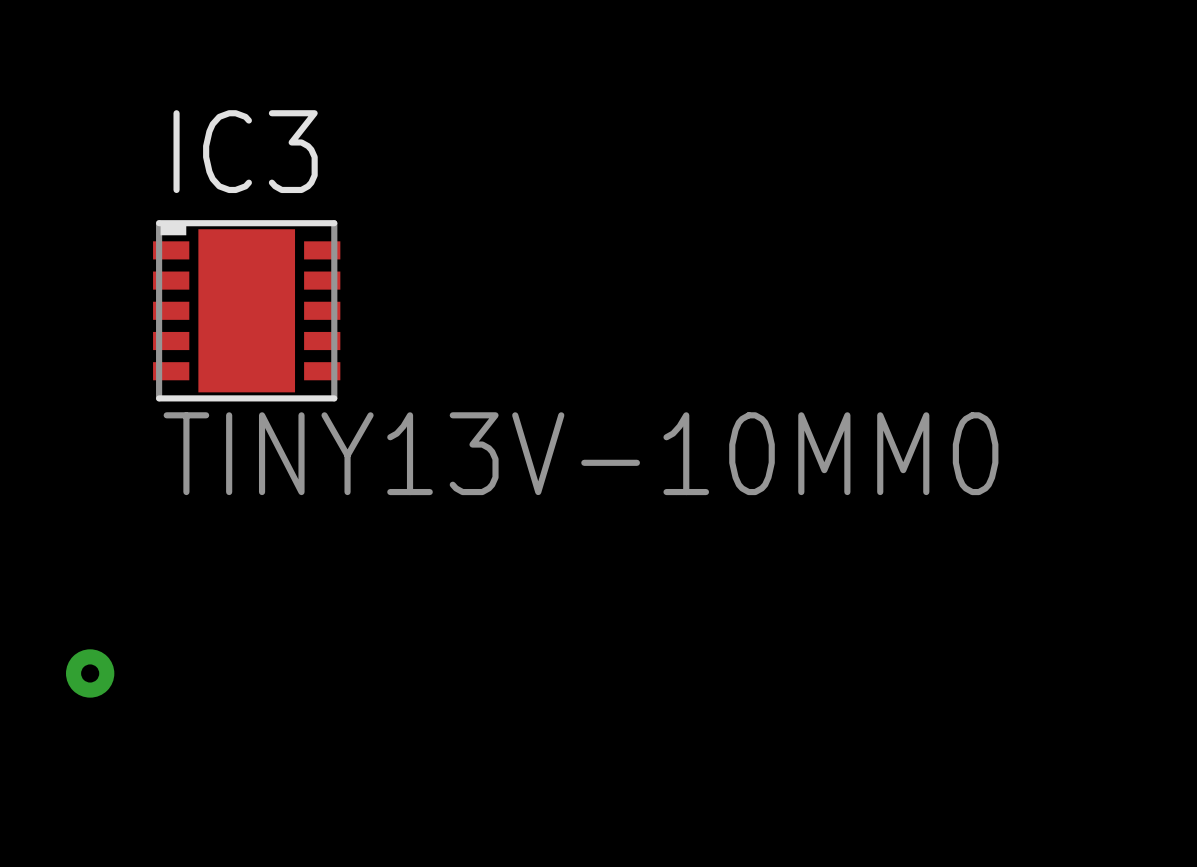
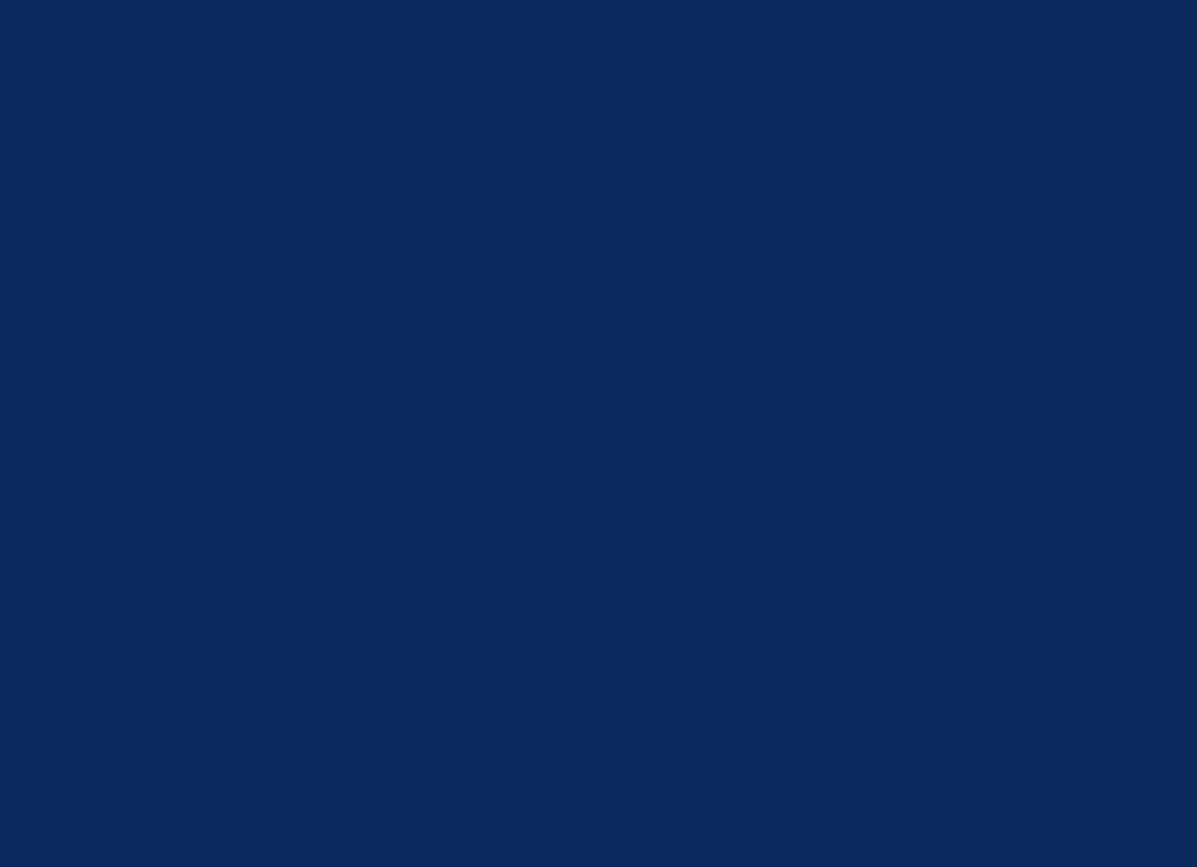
IC3: TINY13V-10MM0 (246, 310) -> none
via: (90, 673) -> none

